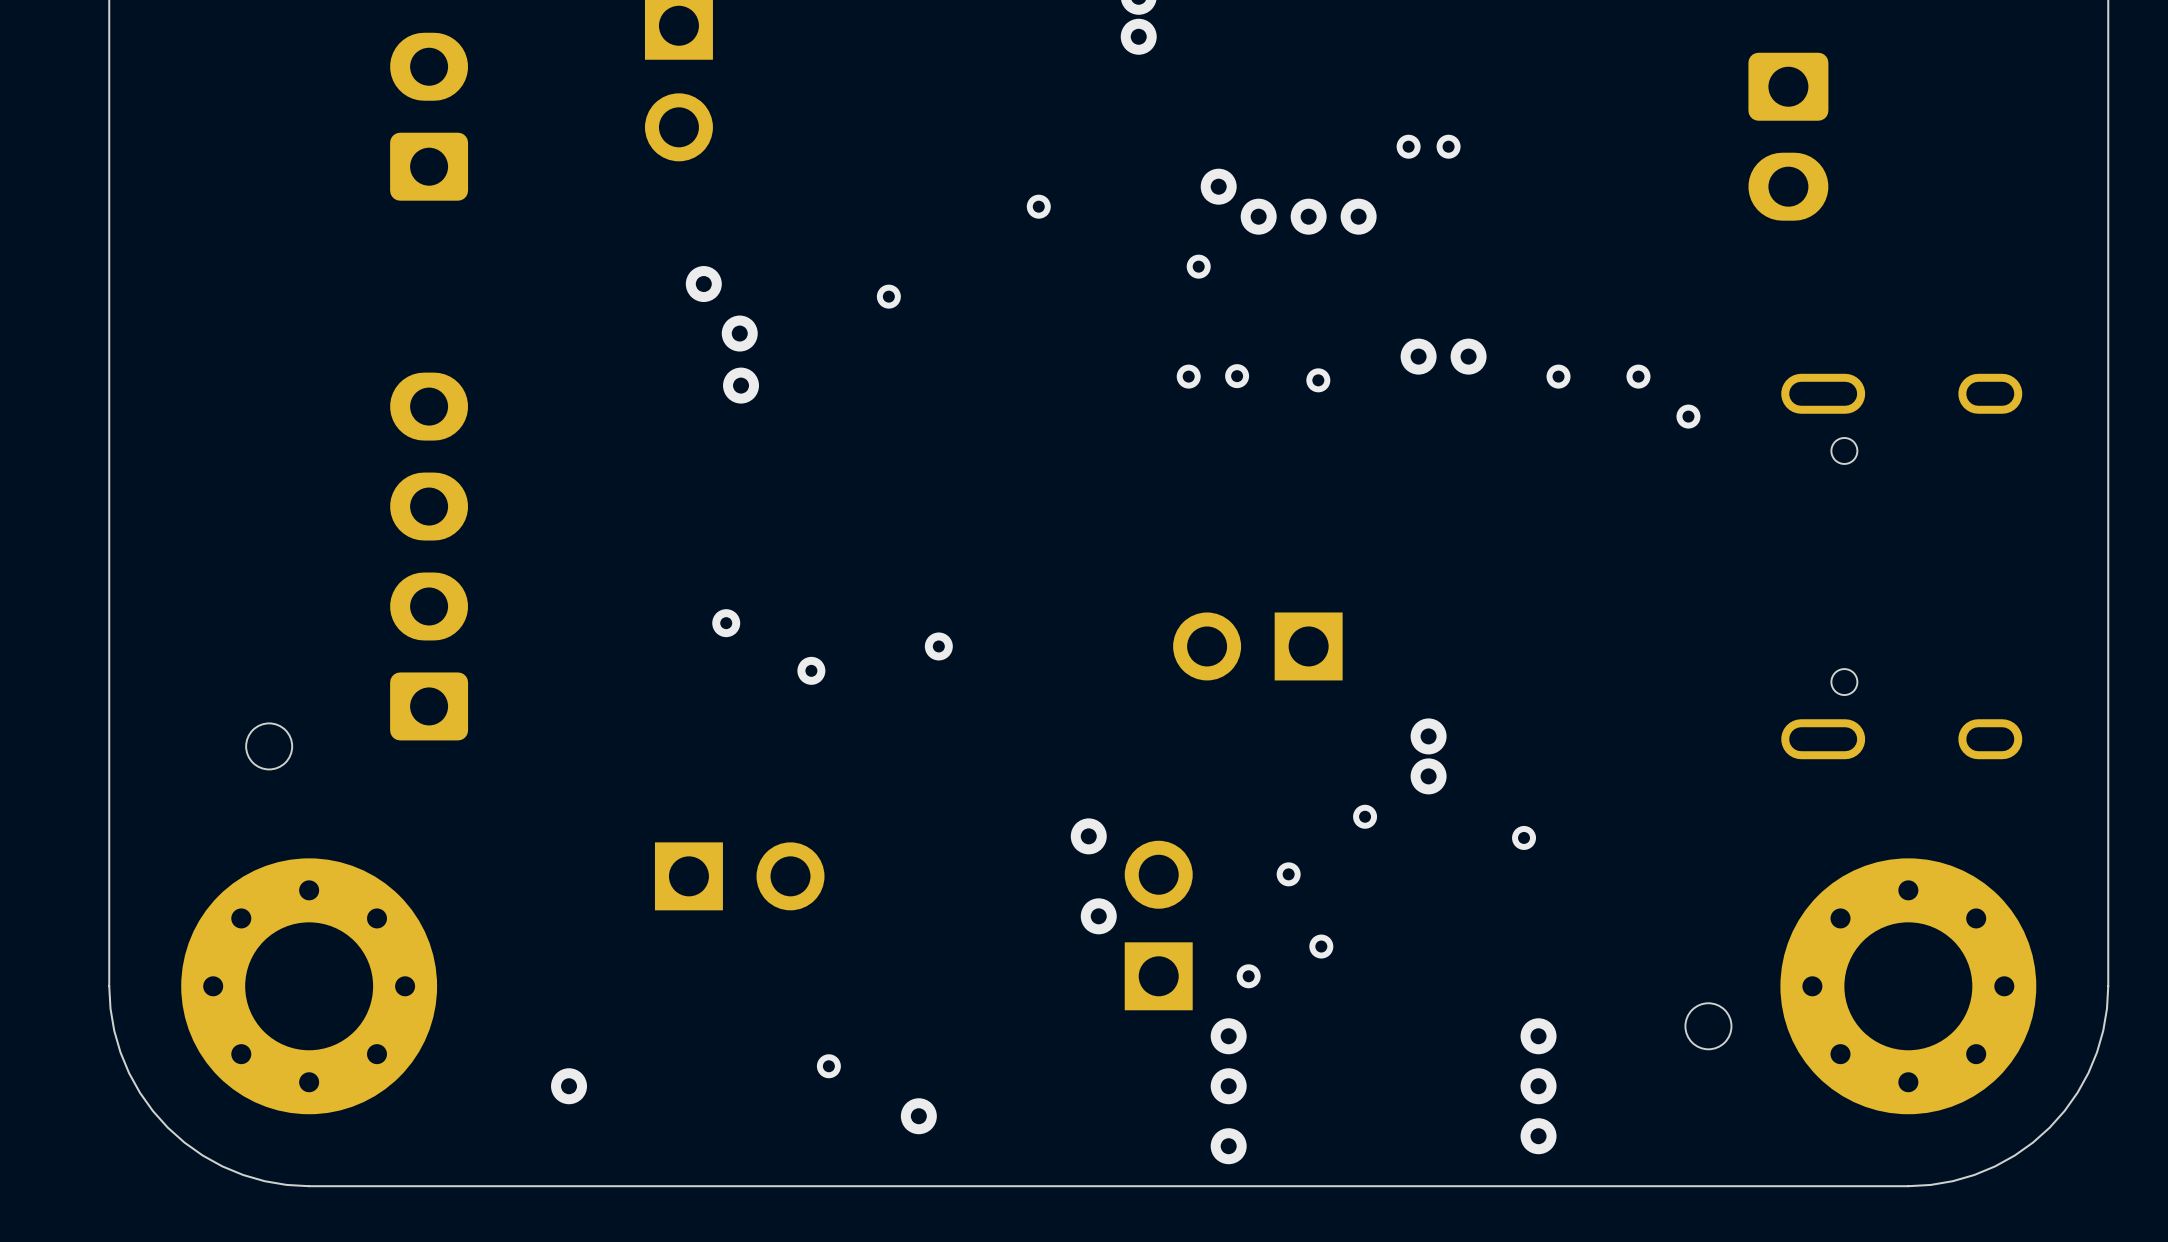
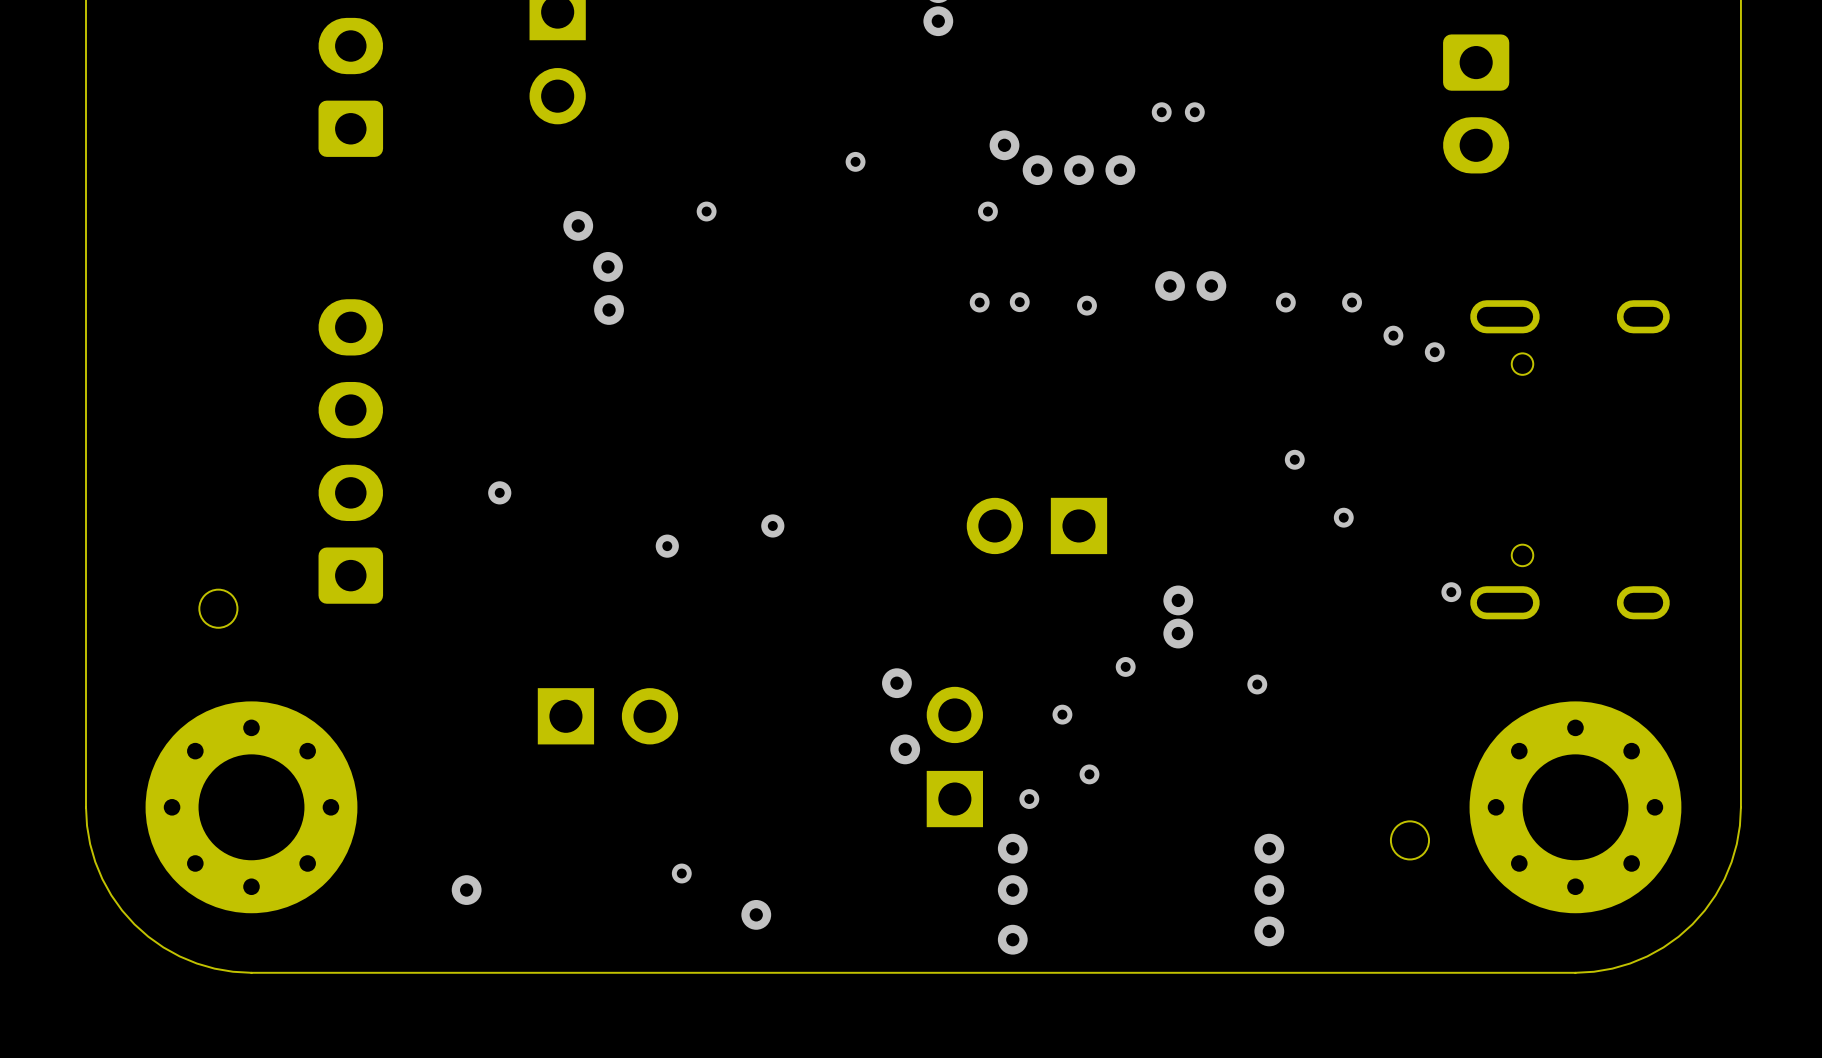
via position: (888, 296) -> (706, 211)
via: none -> (1434, 352)
via: none -> (1294, 459)
via position: (726, 623) -> (499, 492)
via: none -> (1343, 517)
via: none -> (1451, 592)

